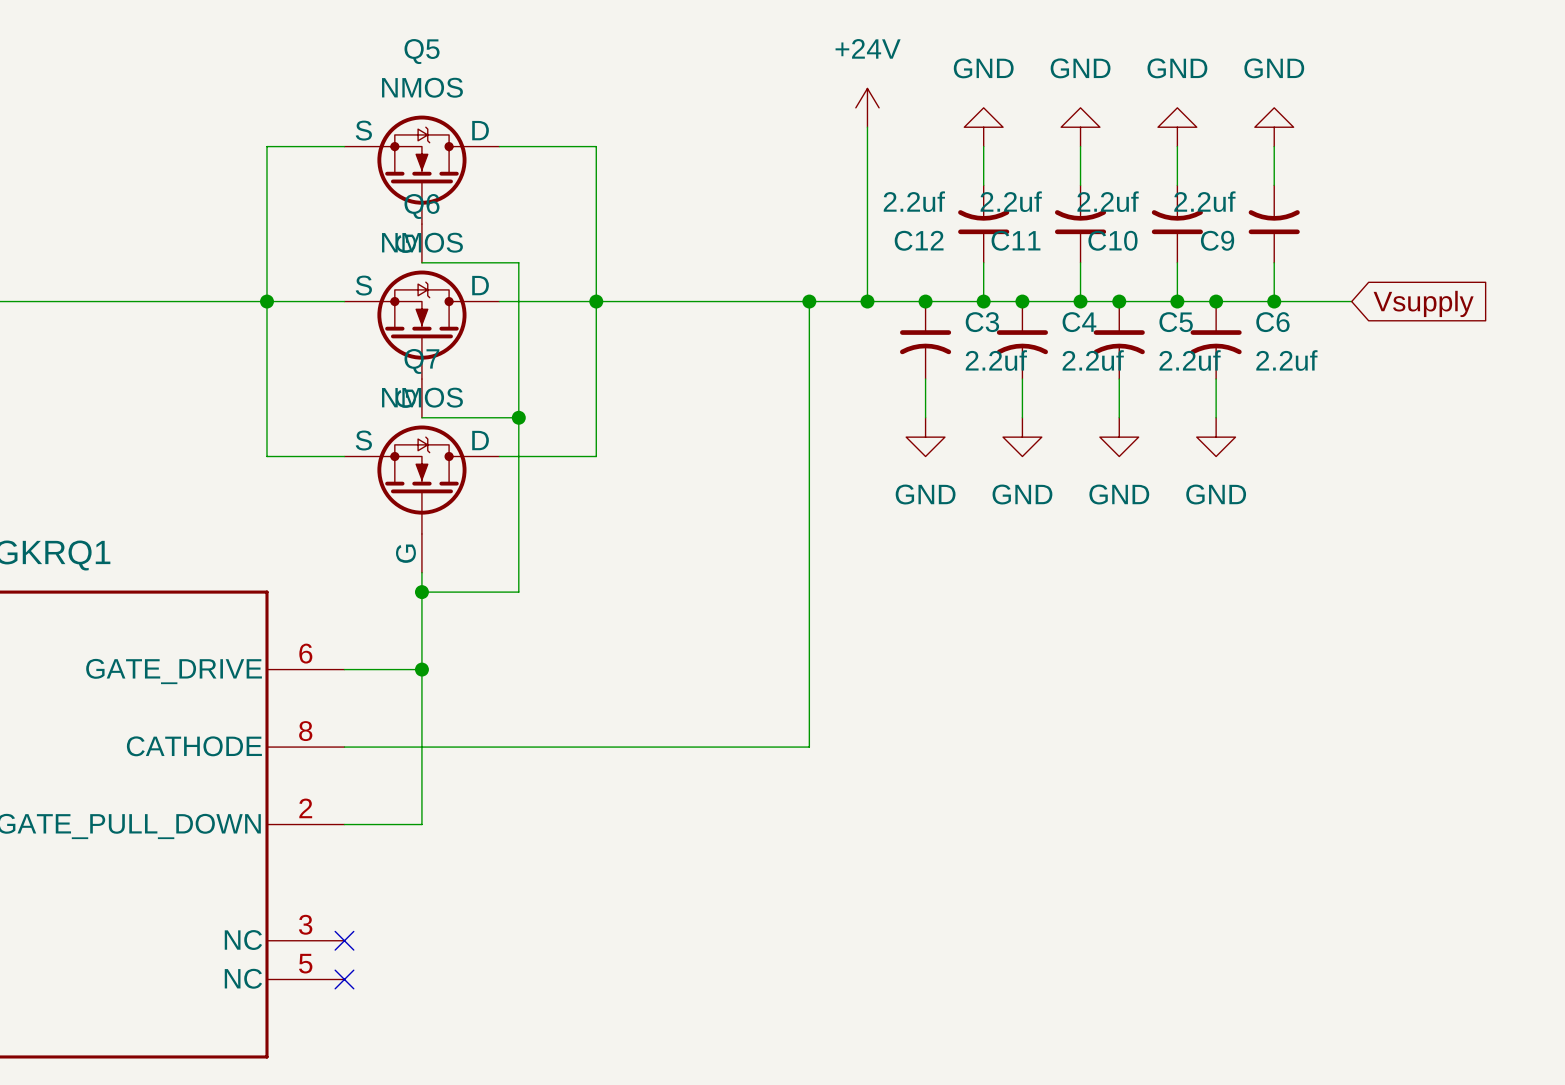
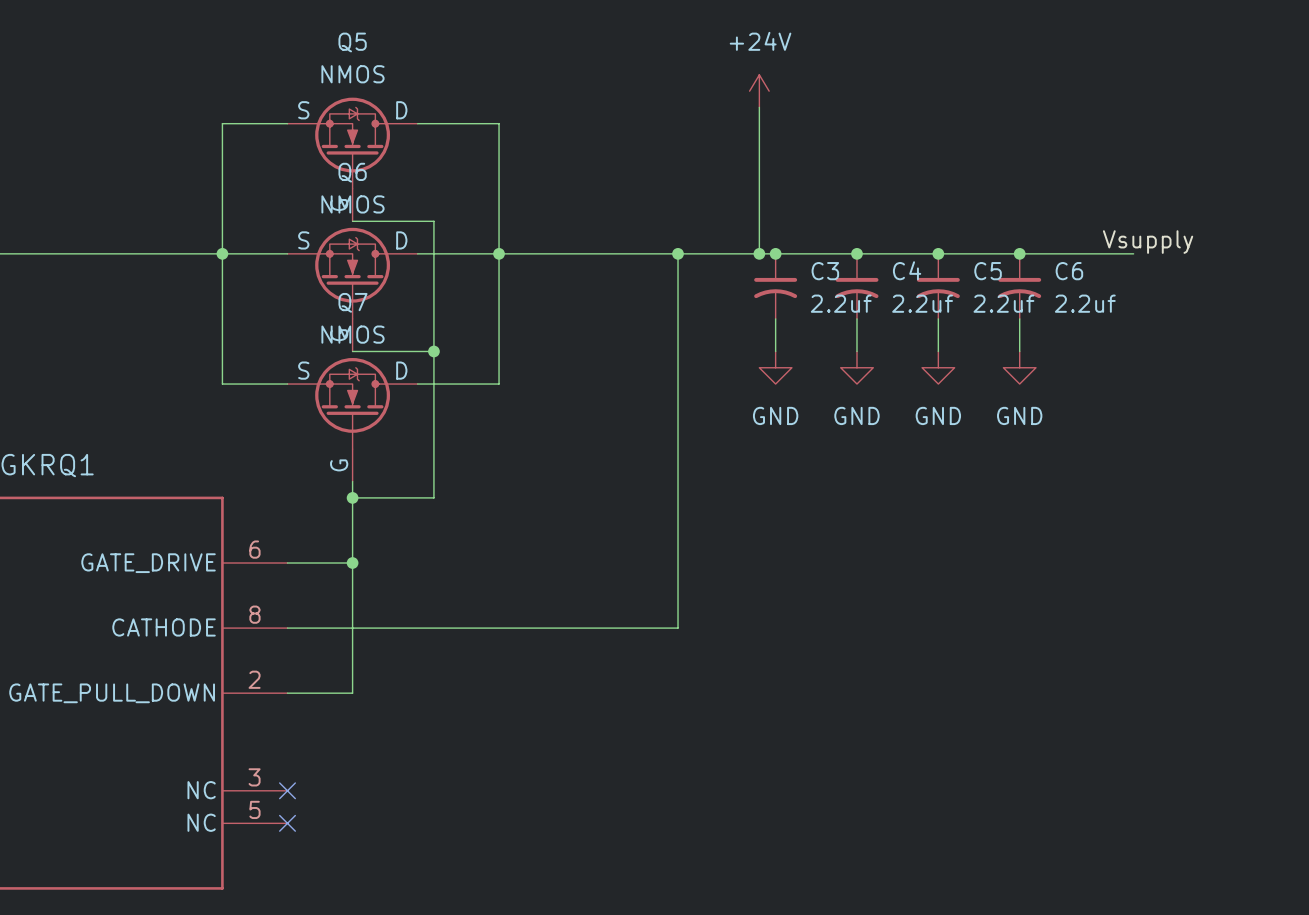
power symbol position: +24V (867, 107) -> +24V (759, 91)
wire: (867, 127) (867, 301) -> (759, 107) (759, 253)
power symbol: GND (983, 127) -> none
power symbol: GND (1080, 127) -> none
power symbol: GND (1177, 127) -> none
power symbol: GND (1274, 127) -> none
wire: (983, 146) (983, 185) -> none
wire: (1080, 146) (1080, 185) -> none
wire: (1177, 146) (1177, 185) -> none
wire: (1274, 146) (1274, 185) -> none
C12: 2.2uf (983, 224) -> none
C11: 2.2uf (1080, 224) -> none
C10: 2.2uf (1177, 224) -> none
C9: 2.2uf (1274, 224) -> none
wire: (983, 262) (983, 301) -> none
wire: (1080, 262) (1080, 301) -> none
wire: (1177, 262) (1177, 301) -> none
wire: (1274, 262) (1274, 301) -> none
label: none -> Vsupply (1148, 242)
junction: (867, 301) -> none
junction: none -> (759, 253)
junction: (983, 301) -> none
junction: (1080, 301) -> none
junction: (1177, 301) -> none
junction: (1274, 301) -> none
global label: Vsupply (1423, 303) -> none

